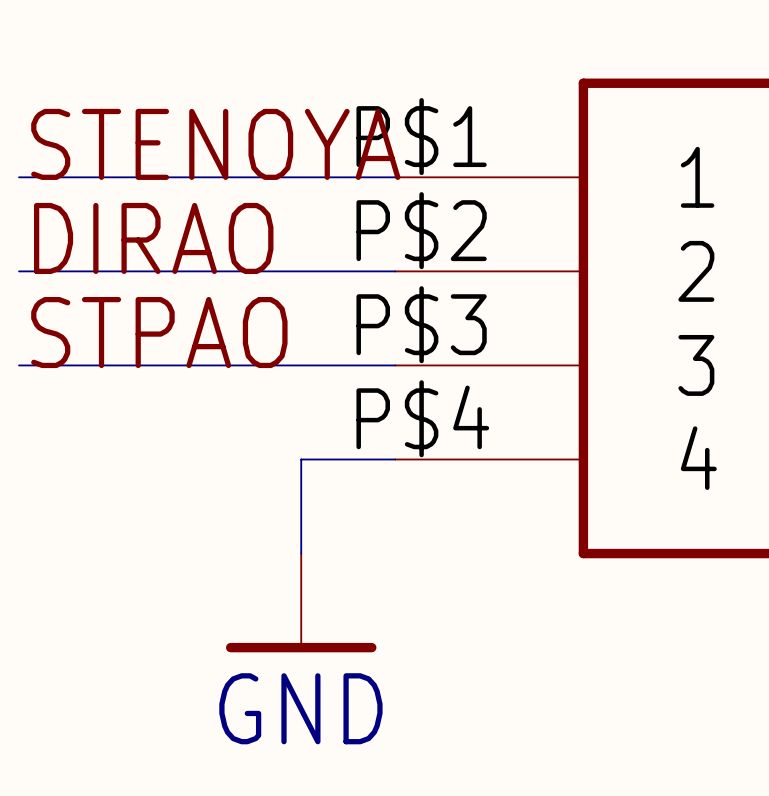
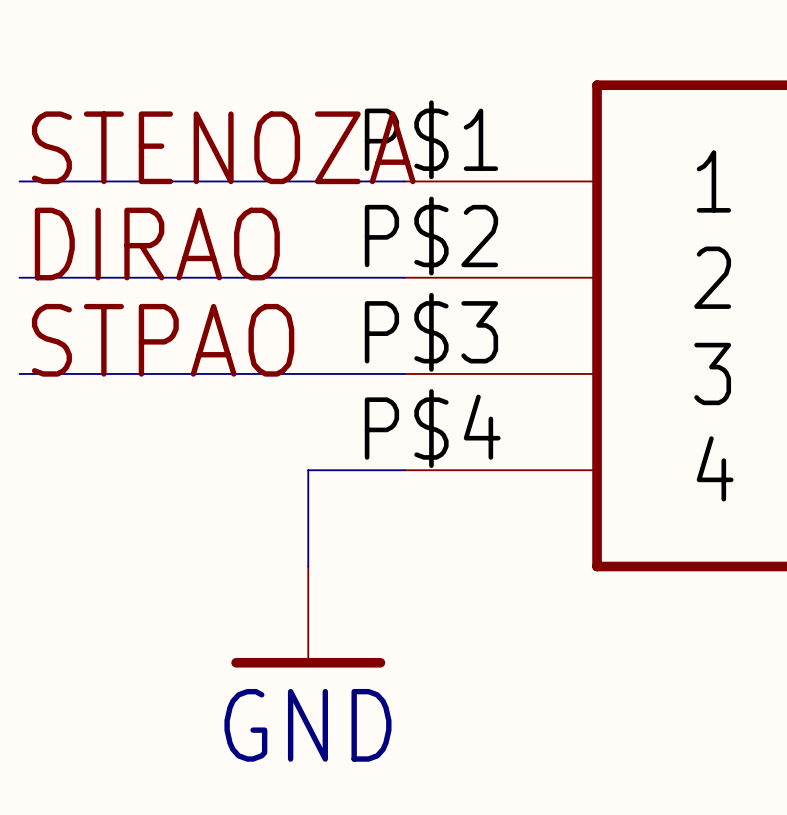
label: STENOYA (215, 144) -> STENOZA (223, 147)

